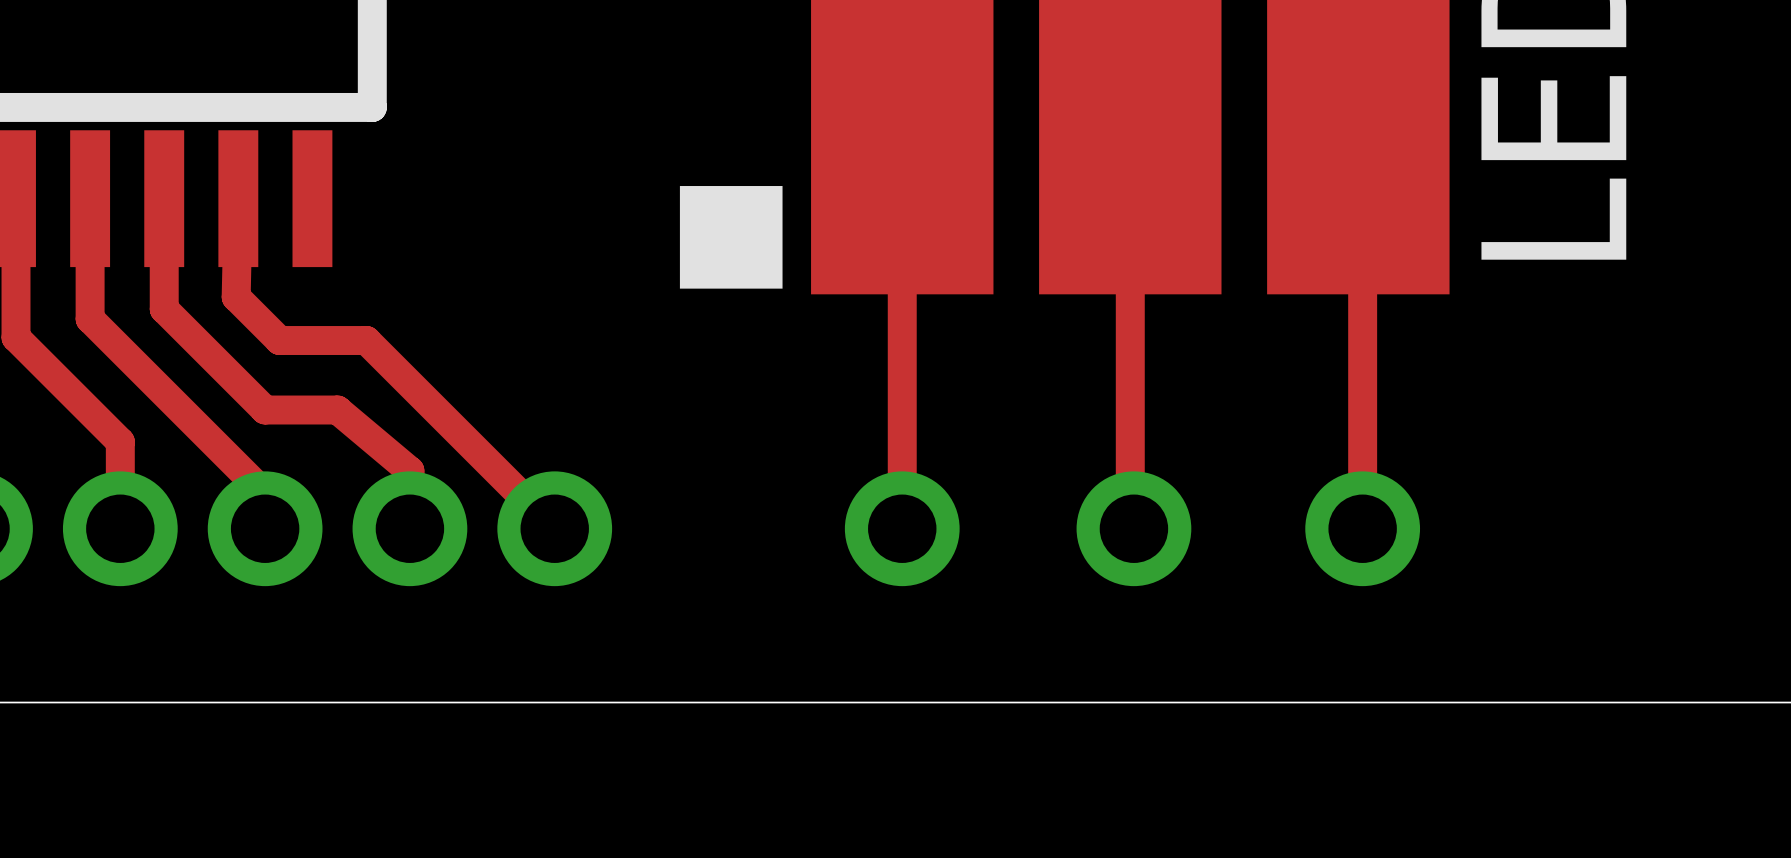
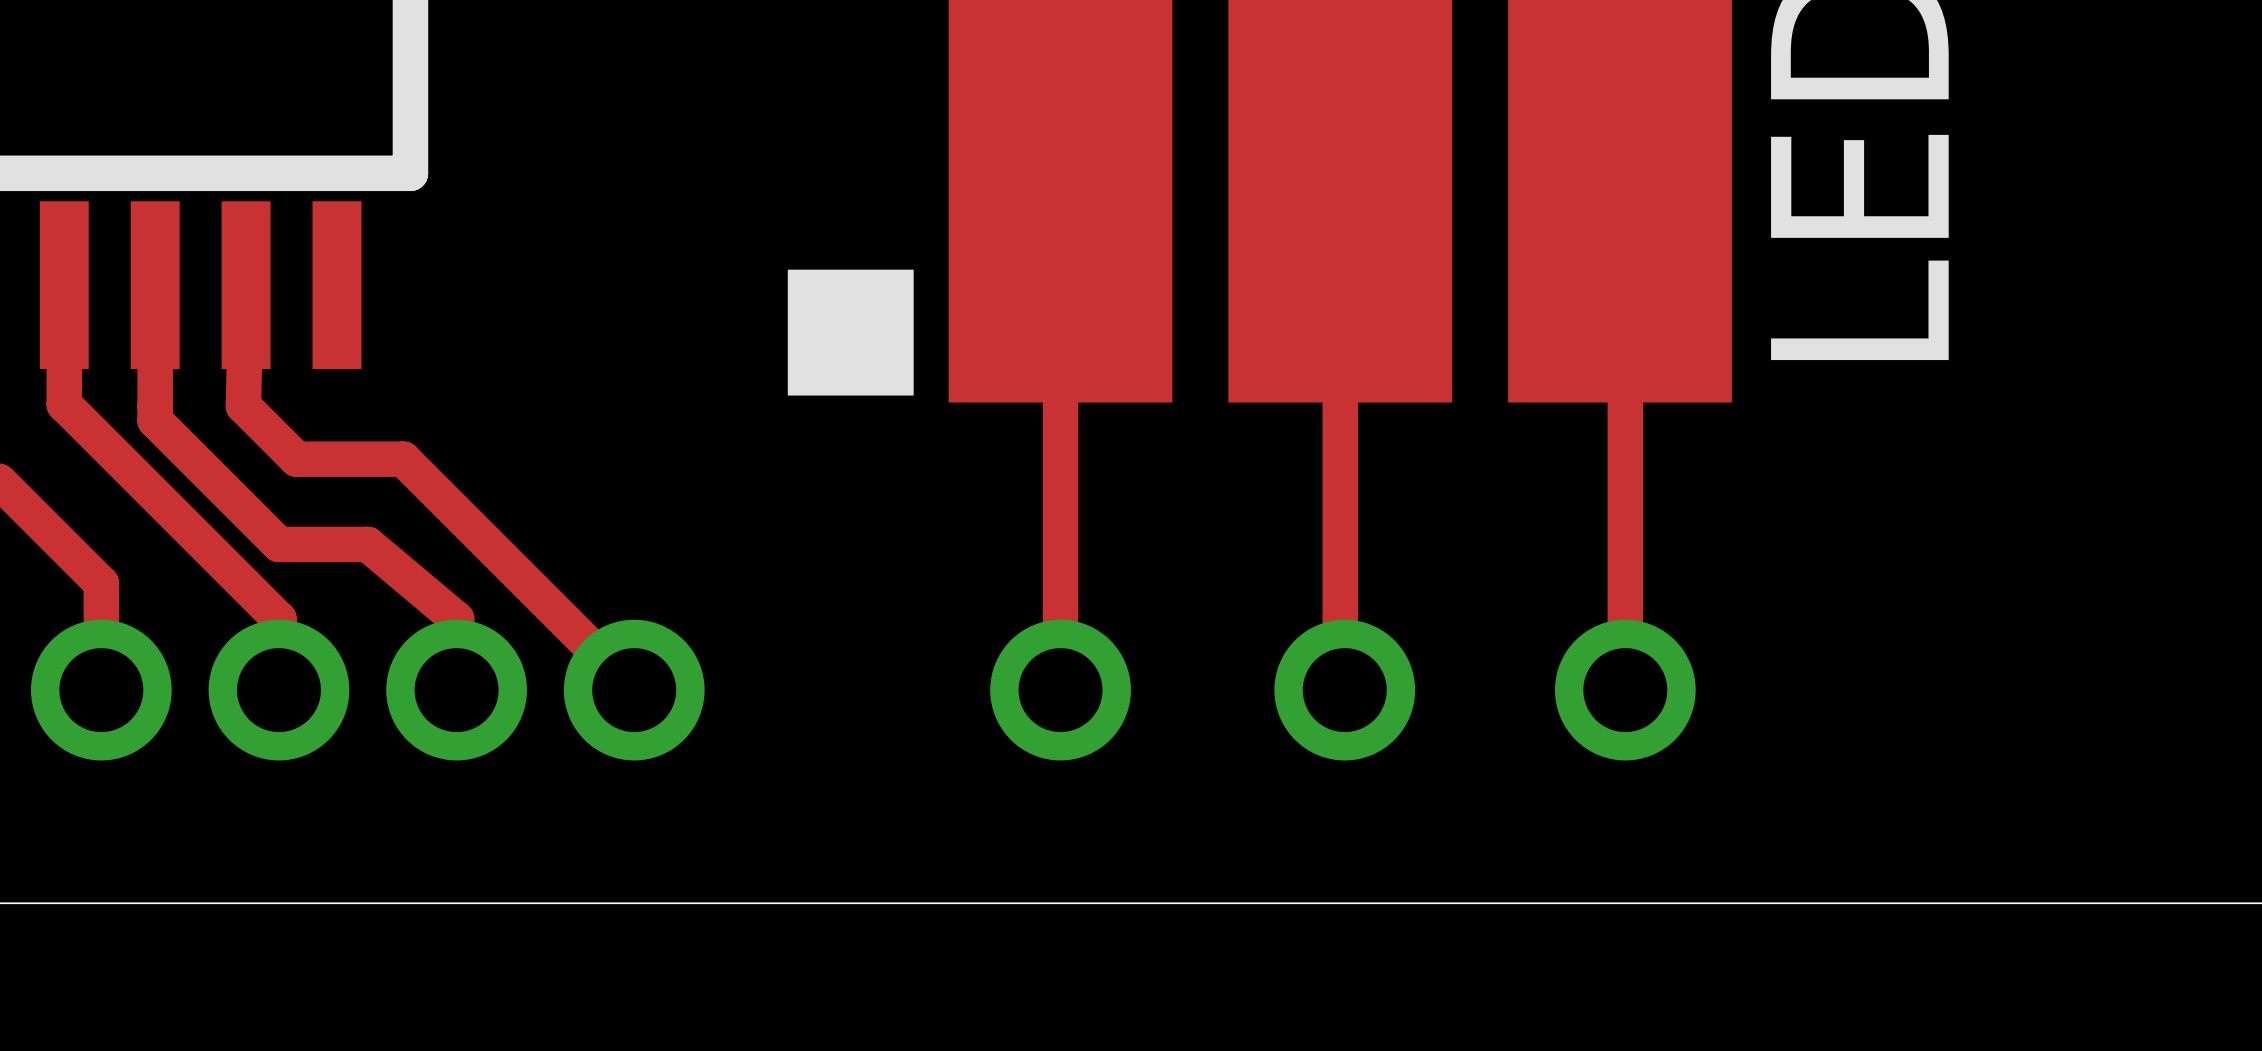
track: (90, 295) (90, 318) (265, 494) -> (64, 404) (278, 619) (278, 647)

